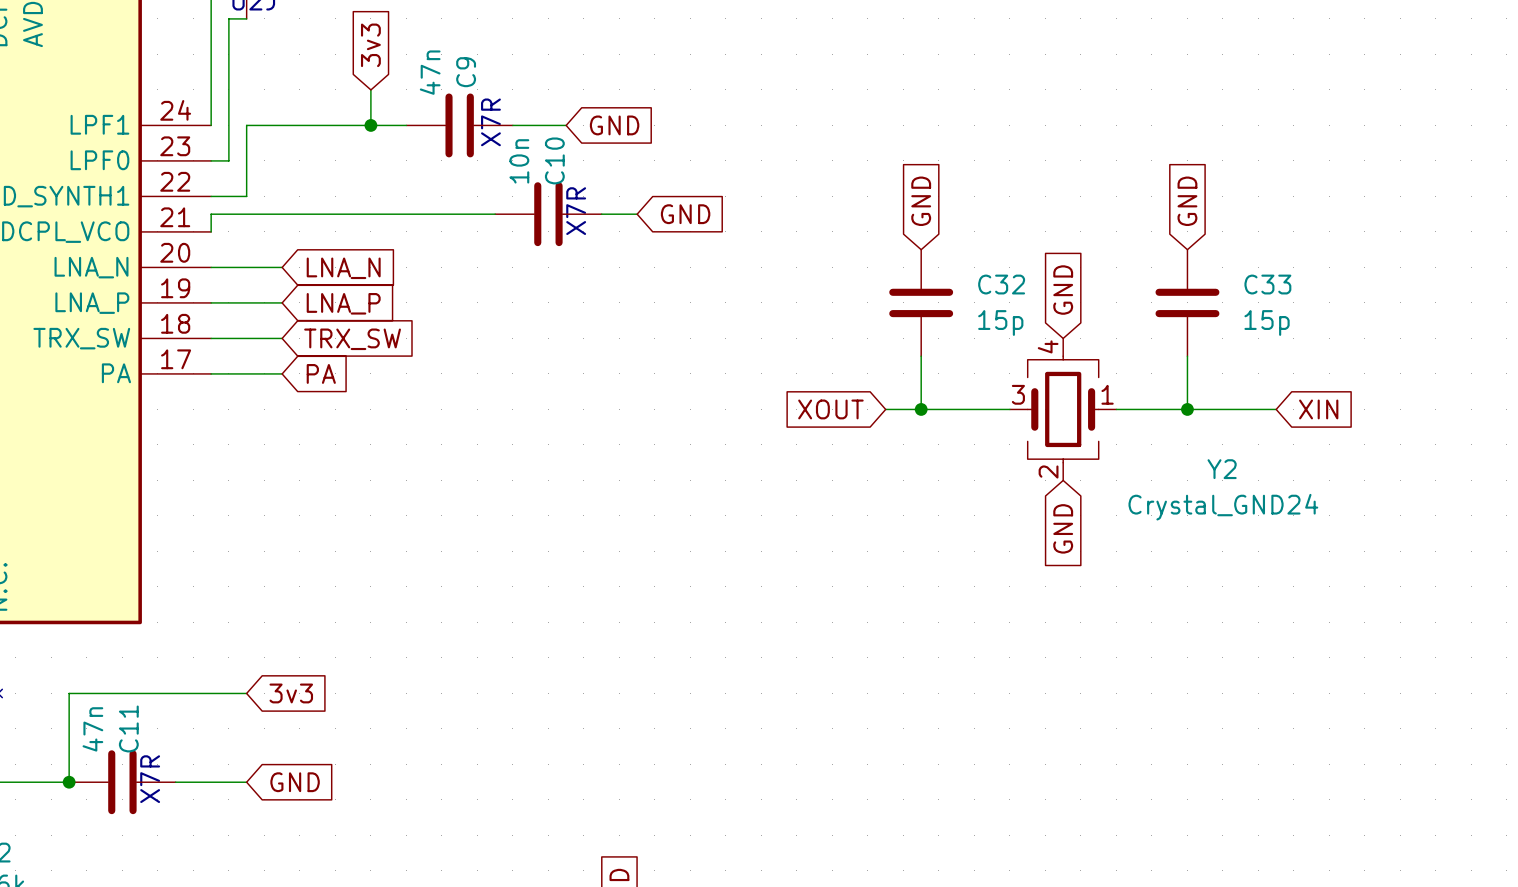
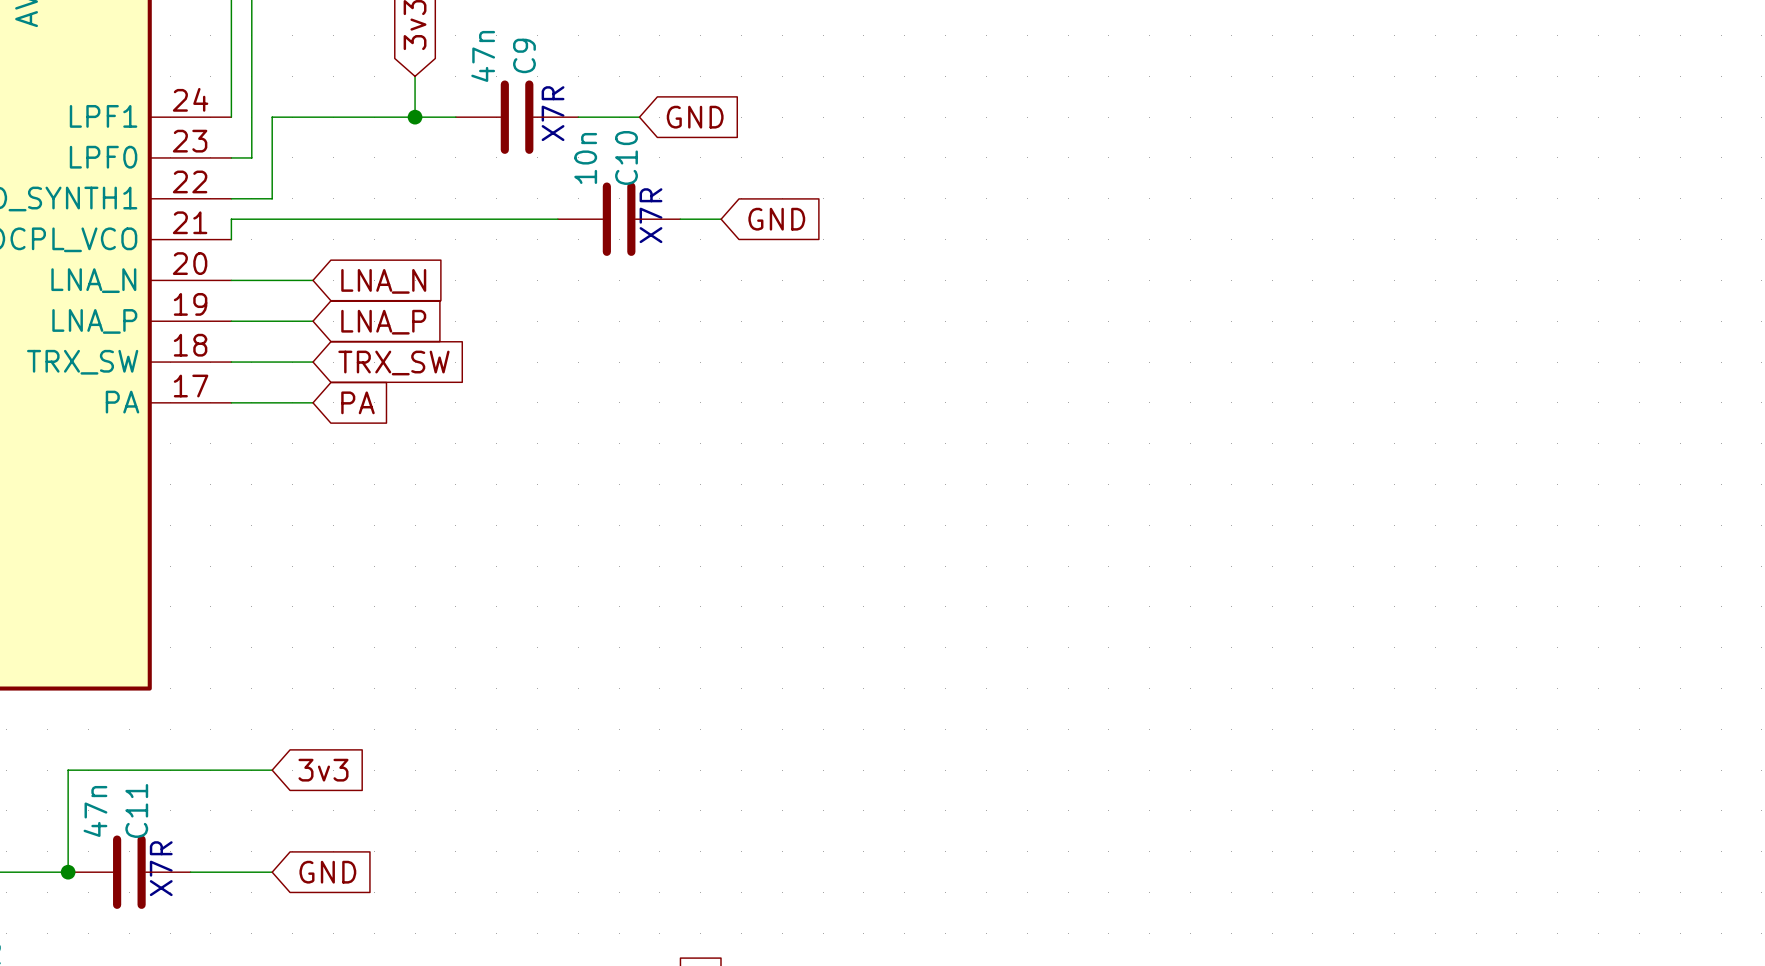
global label: GND (921, 201) -> none
global label: GND (1187, 201) -> none
global label: GND (1063, 290) -> none
C32: 15p (921, 302) -> none
C33: 15p (1187, 302) -> none
wire: (921, 356) (921, 409) -> none
wire: (1187, 356) (1187, 409) -> none
global label: XOUT (830, 409) -> none
wire: (885, 409) (1009, 409) -> none
junction: (921, 409) -> none
Y2: Crystal_GND24 (1063, 409) -> none
wire: (1116, 409) (1276, 409) -> none
junction: (1187, 409) -> none
global label: XIN (1318, 409) -> none
global label: GND (1063, 528) -> none

